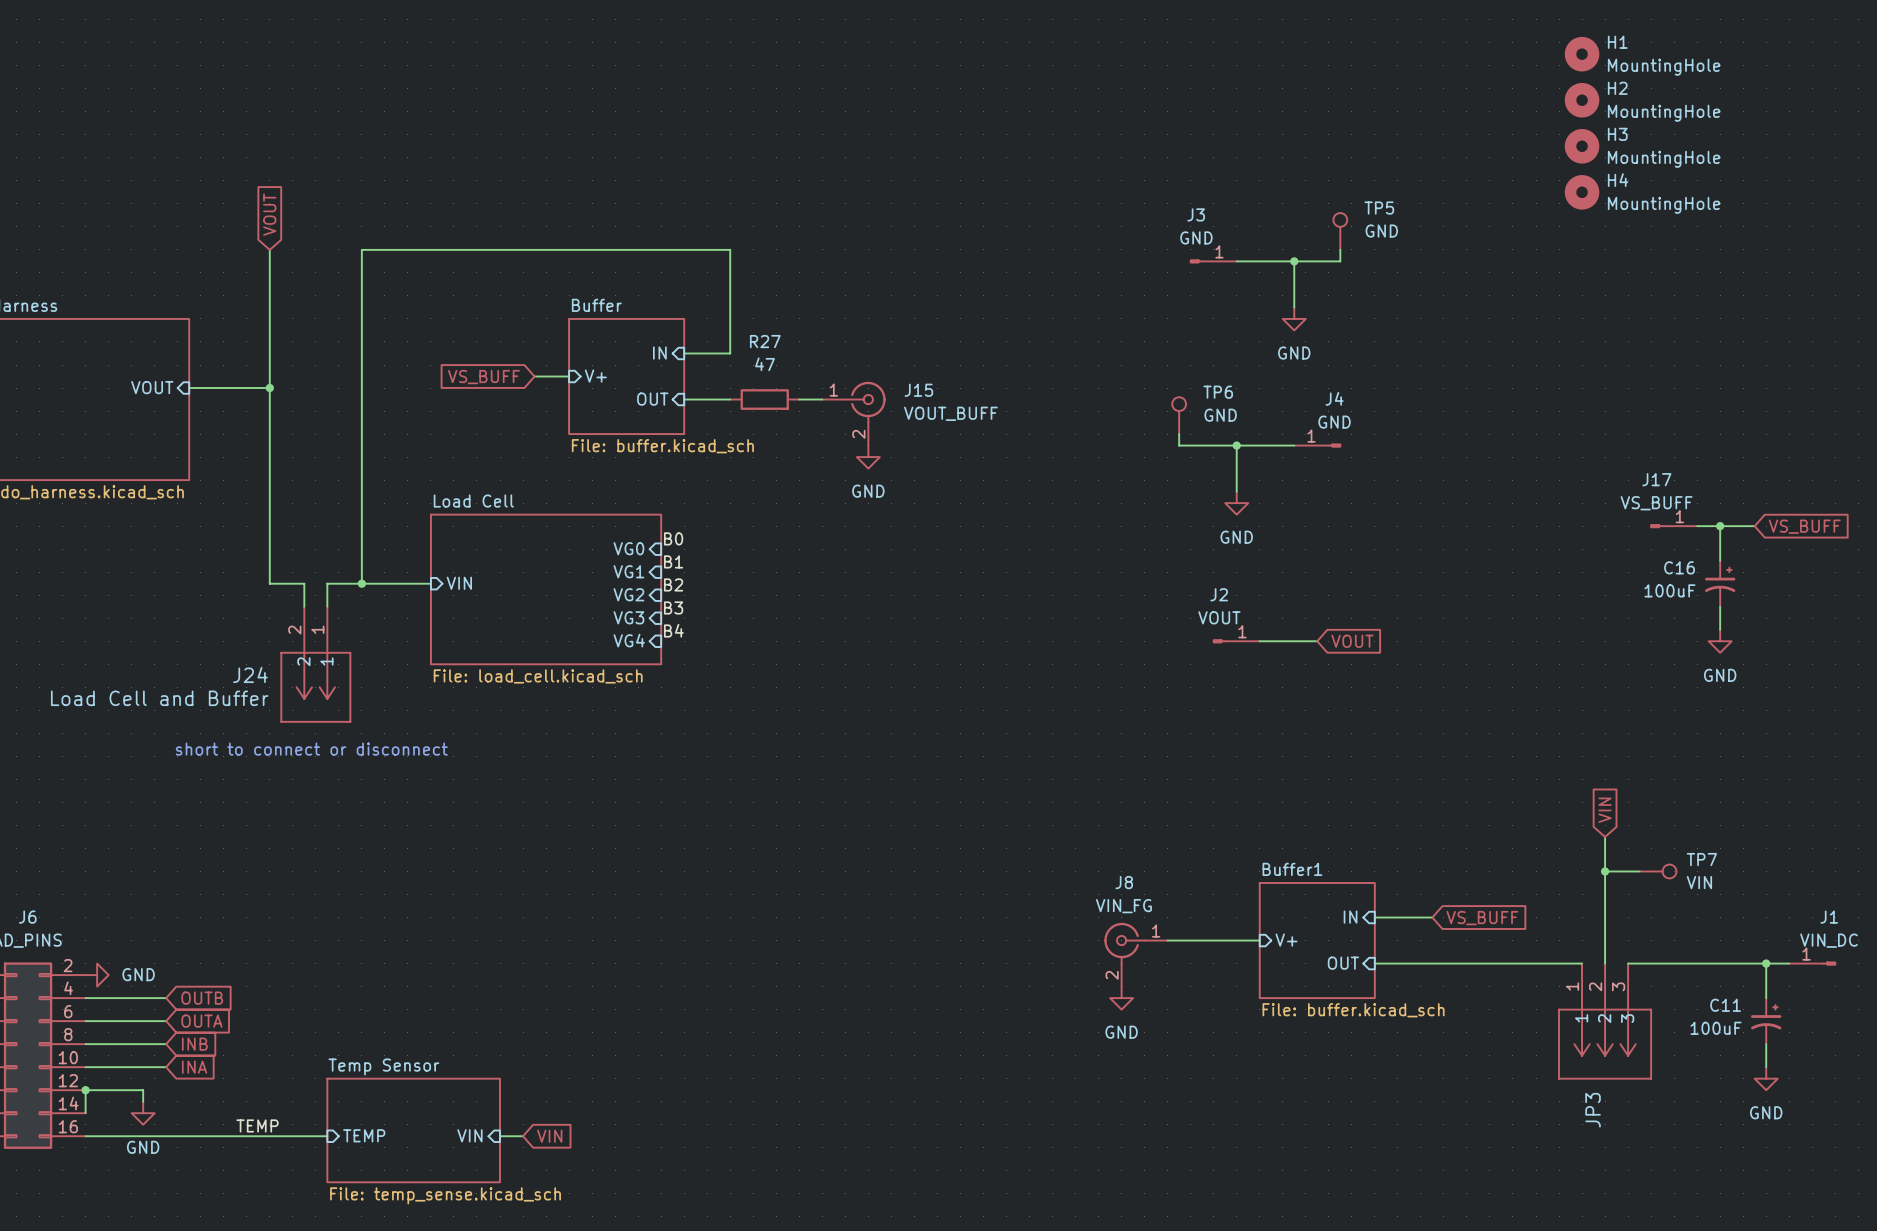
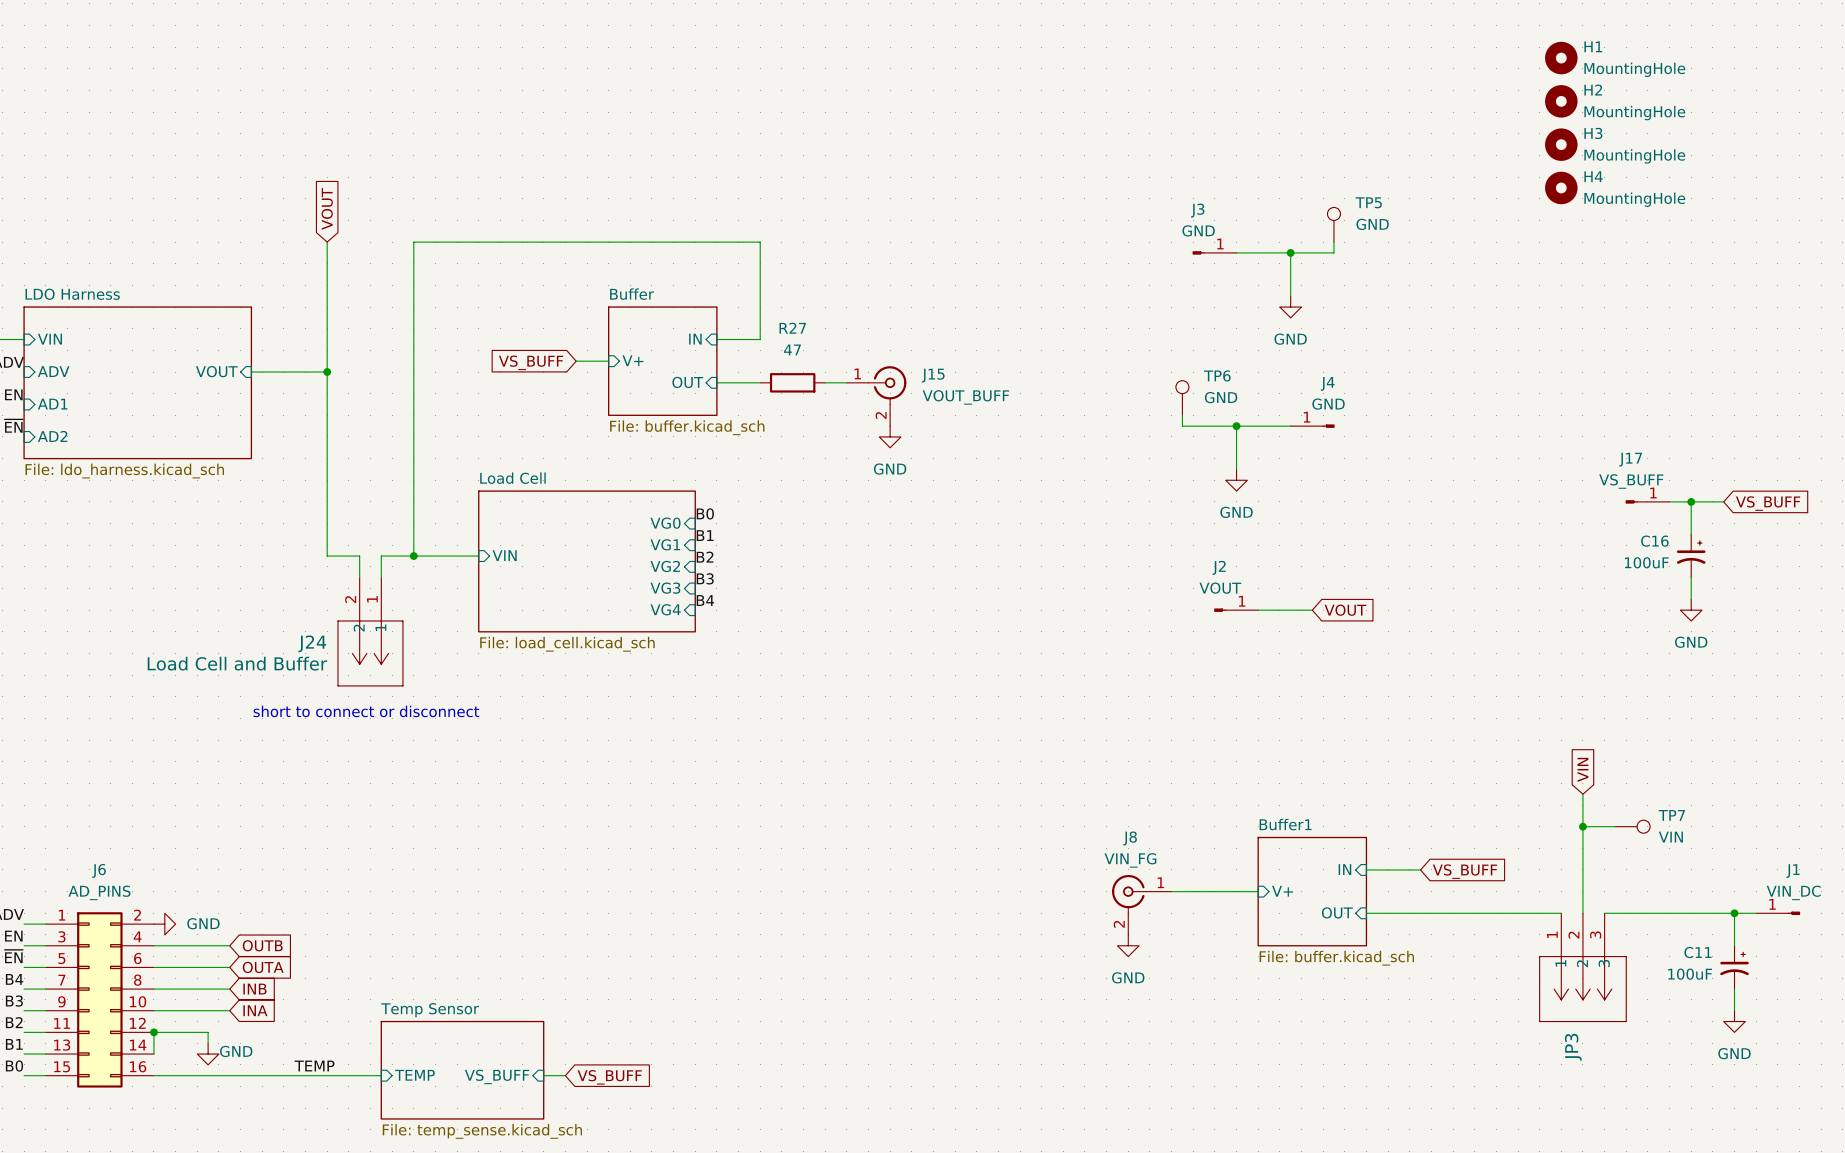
sheet pin: VIN (469, 1135) -> VS_BUFF (497, 1076)
global label: VIN (549, 1136) -> VS_BUFF (609, 1077)
power symbol text position: GND (143, 1147) -> GND (236, 1051)

